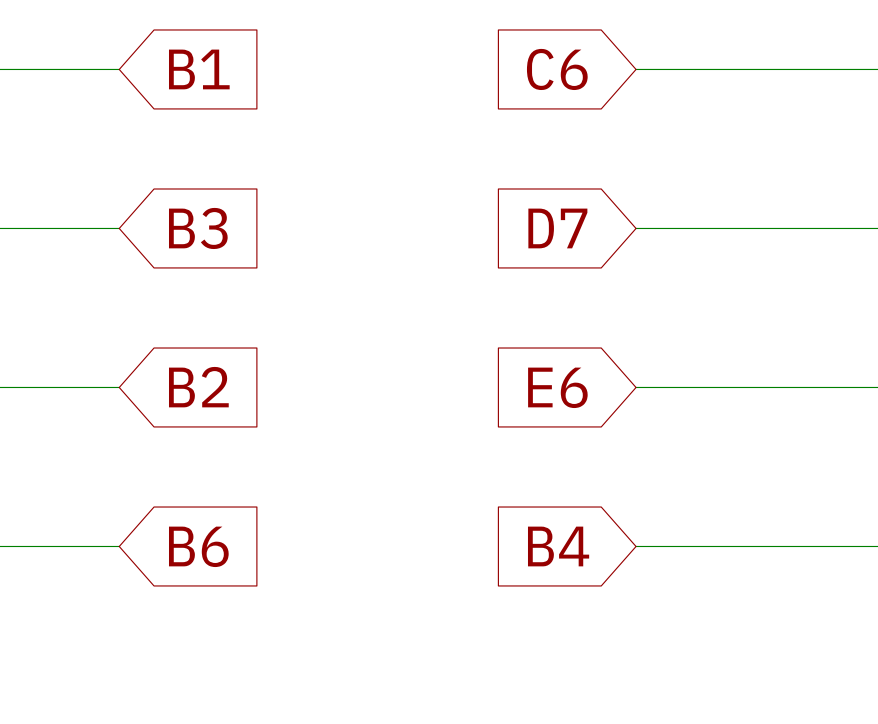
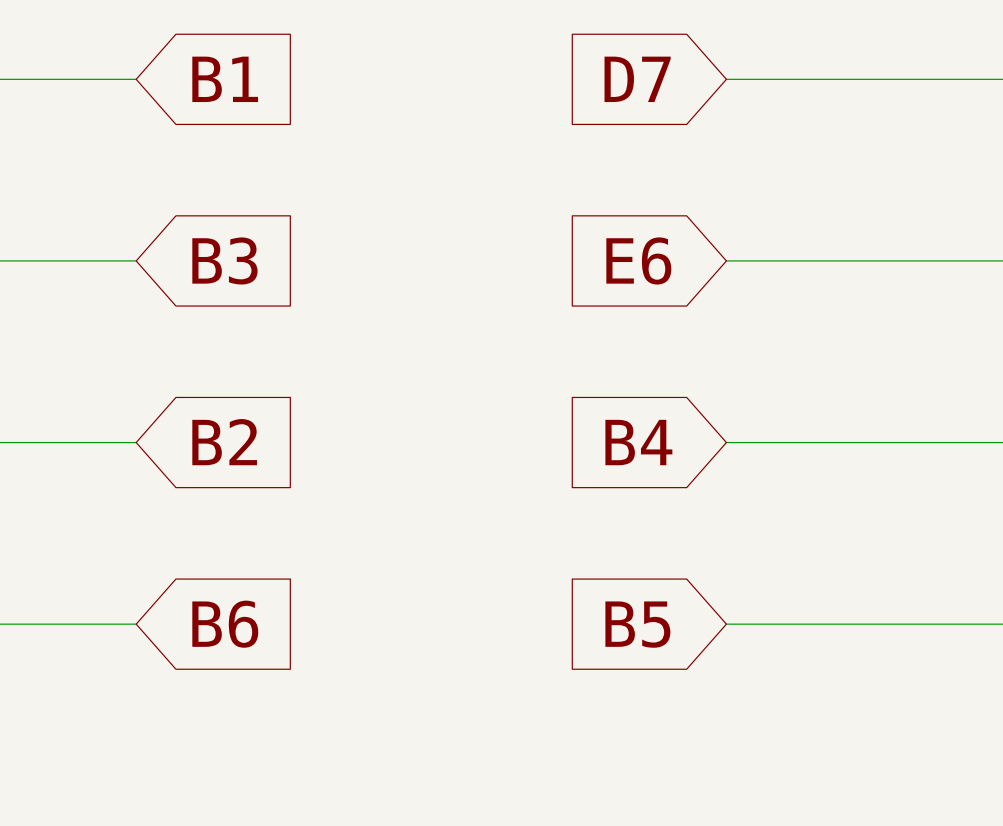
global label: C6 (557, 69) -> D7 (637, 79)
global label: D7 (557, 228) -> E6 (638, 260)
global label: E6 (557, 387) -> B4 (638, 442)
global label: B4 (558, 546) -> B5 (637, 624)

